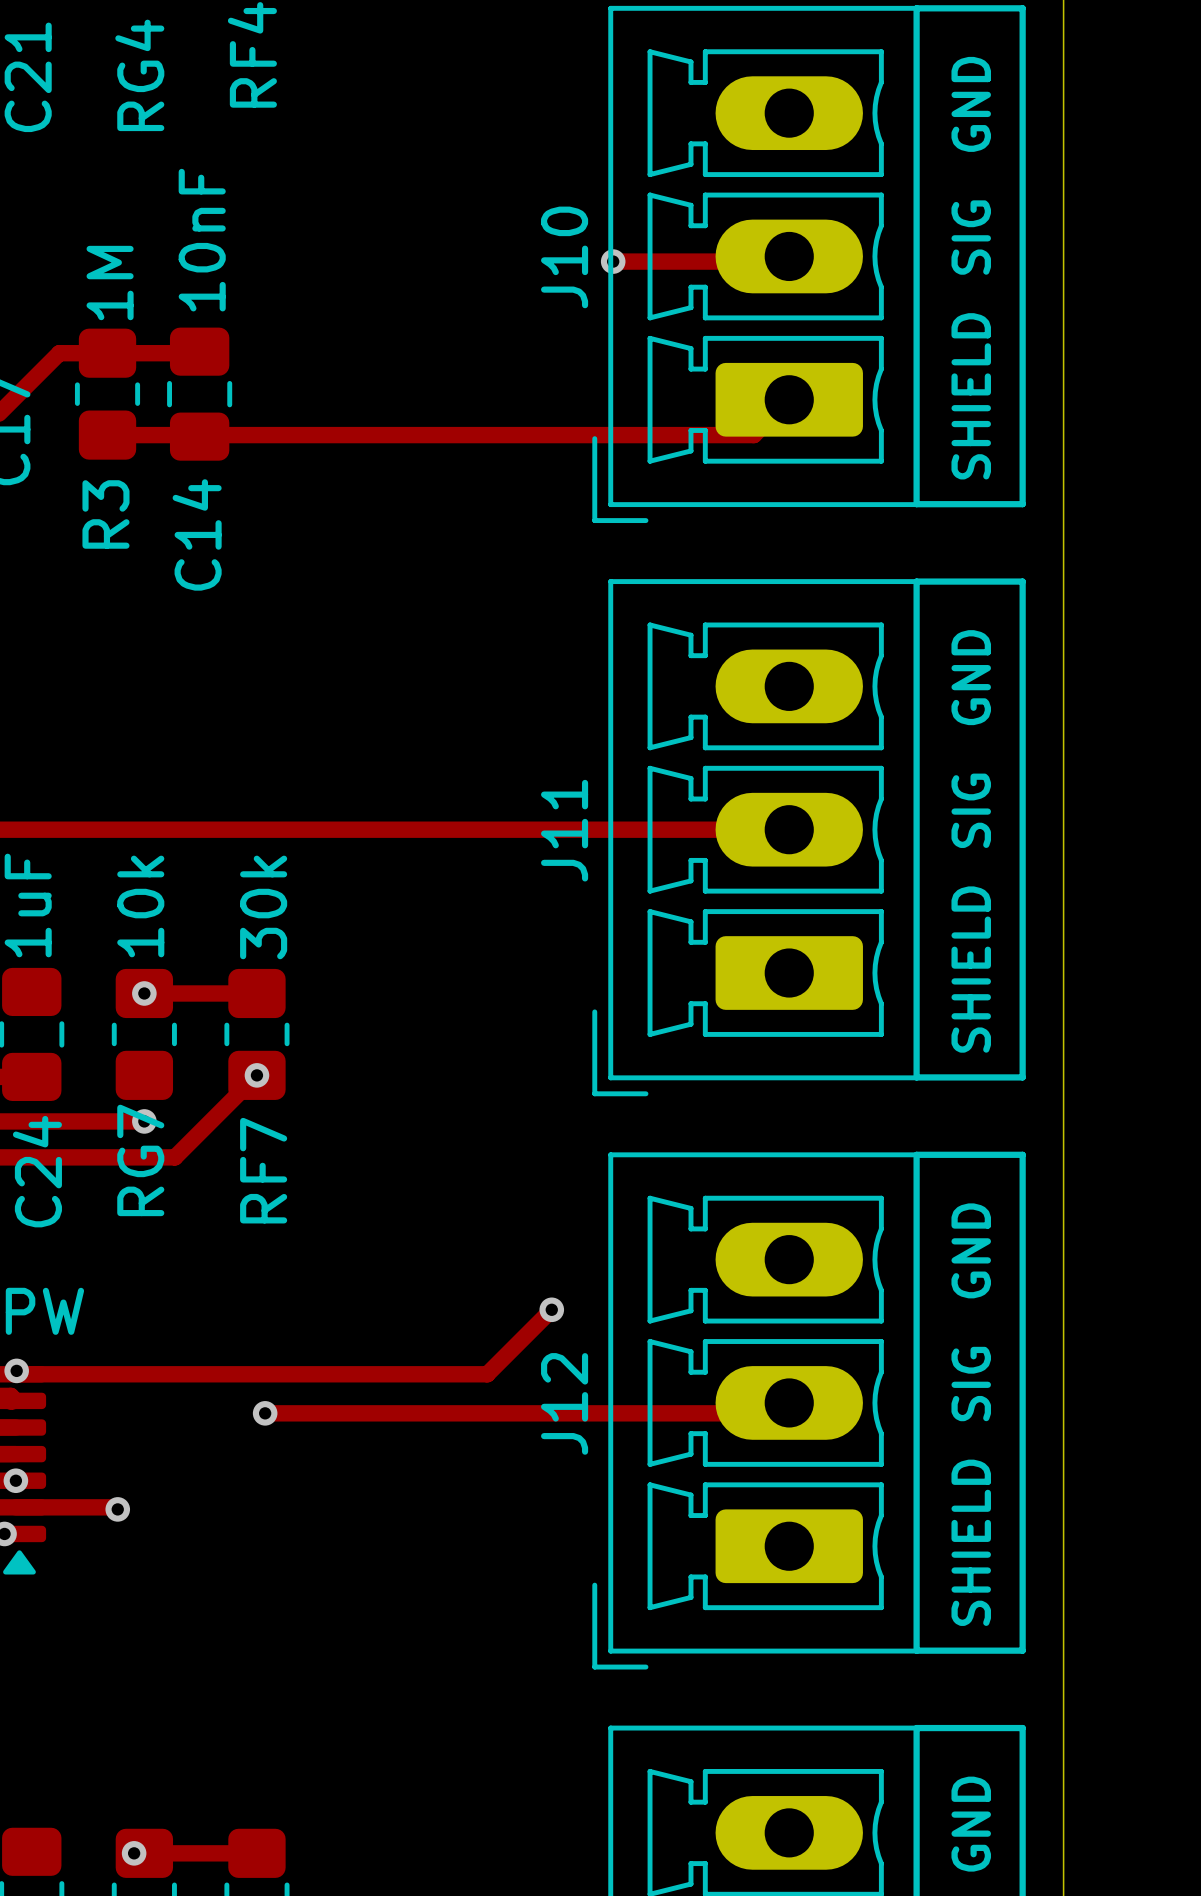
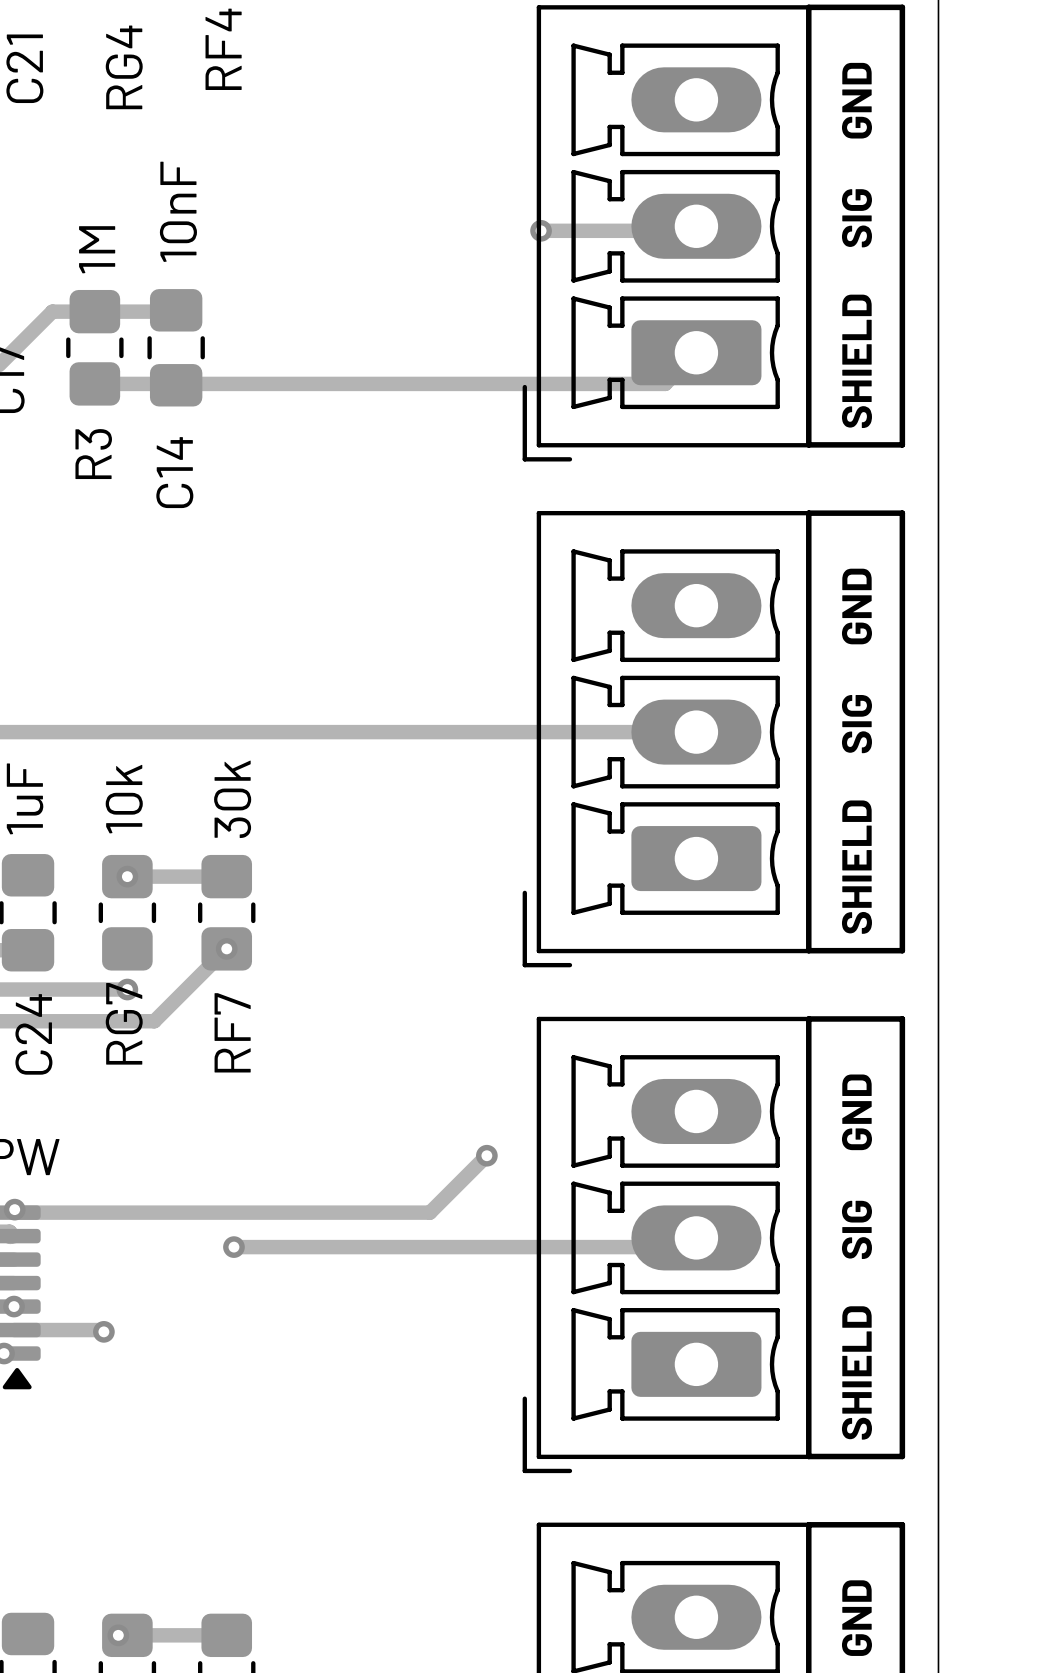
J10 name: J10 (564, 257) -> none
J11 name: J11 (564, 830) -> none
J12 name: J12 (564, 1403) -> none

